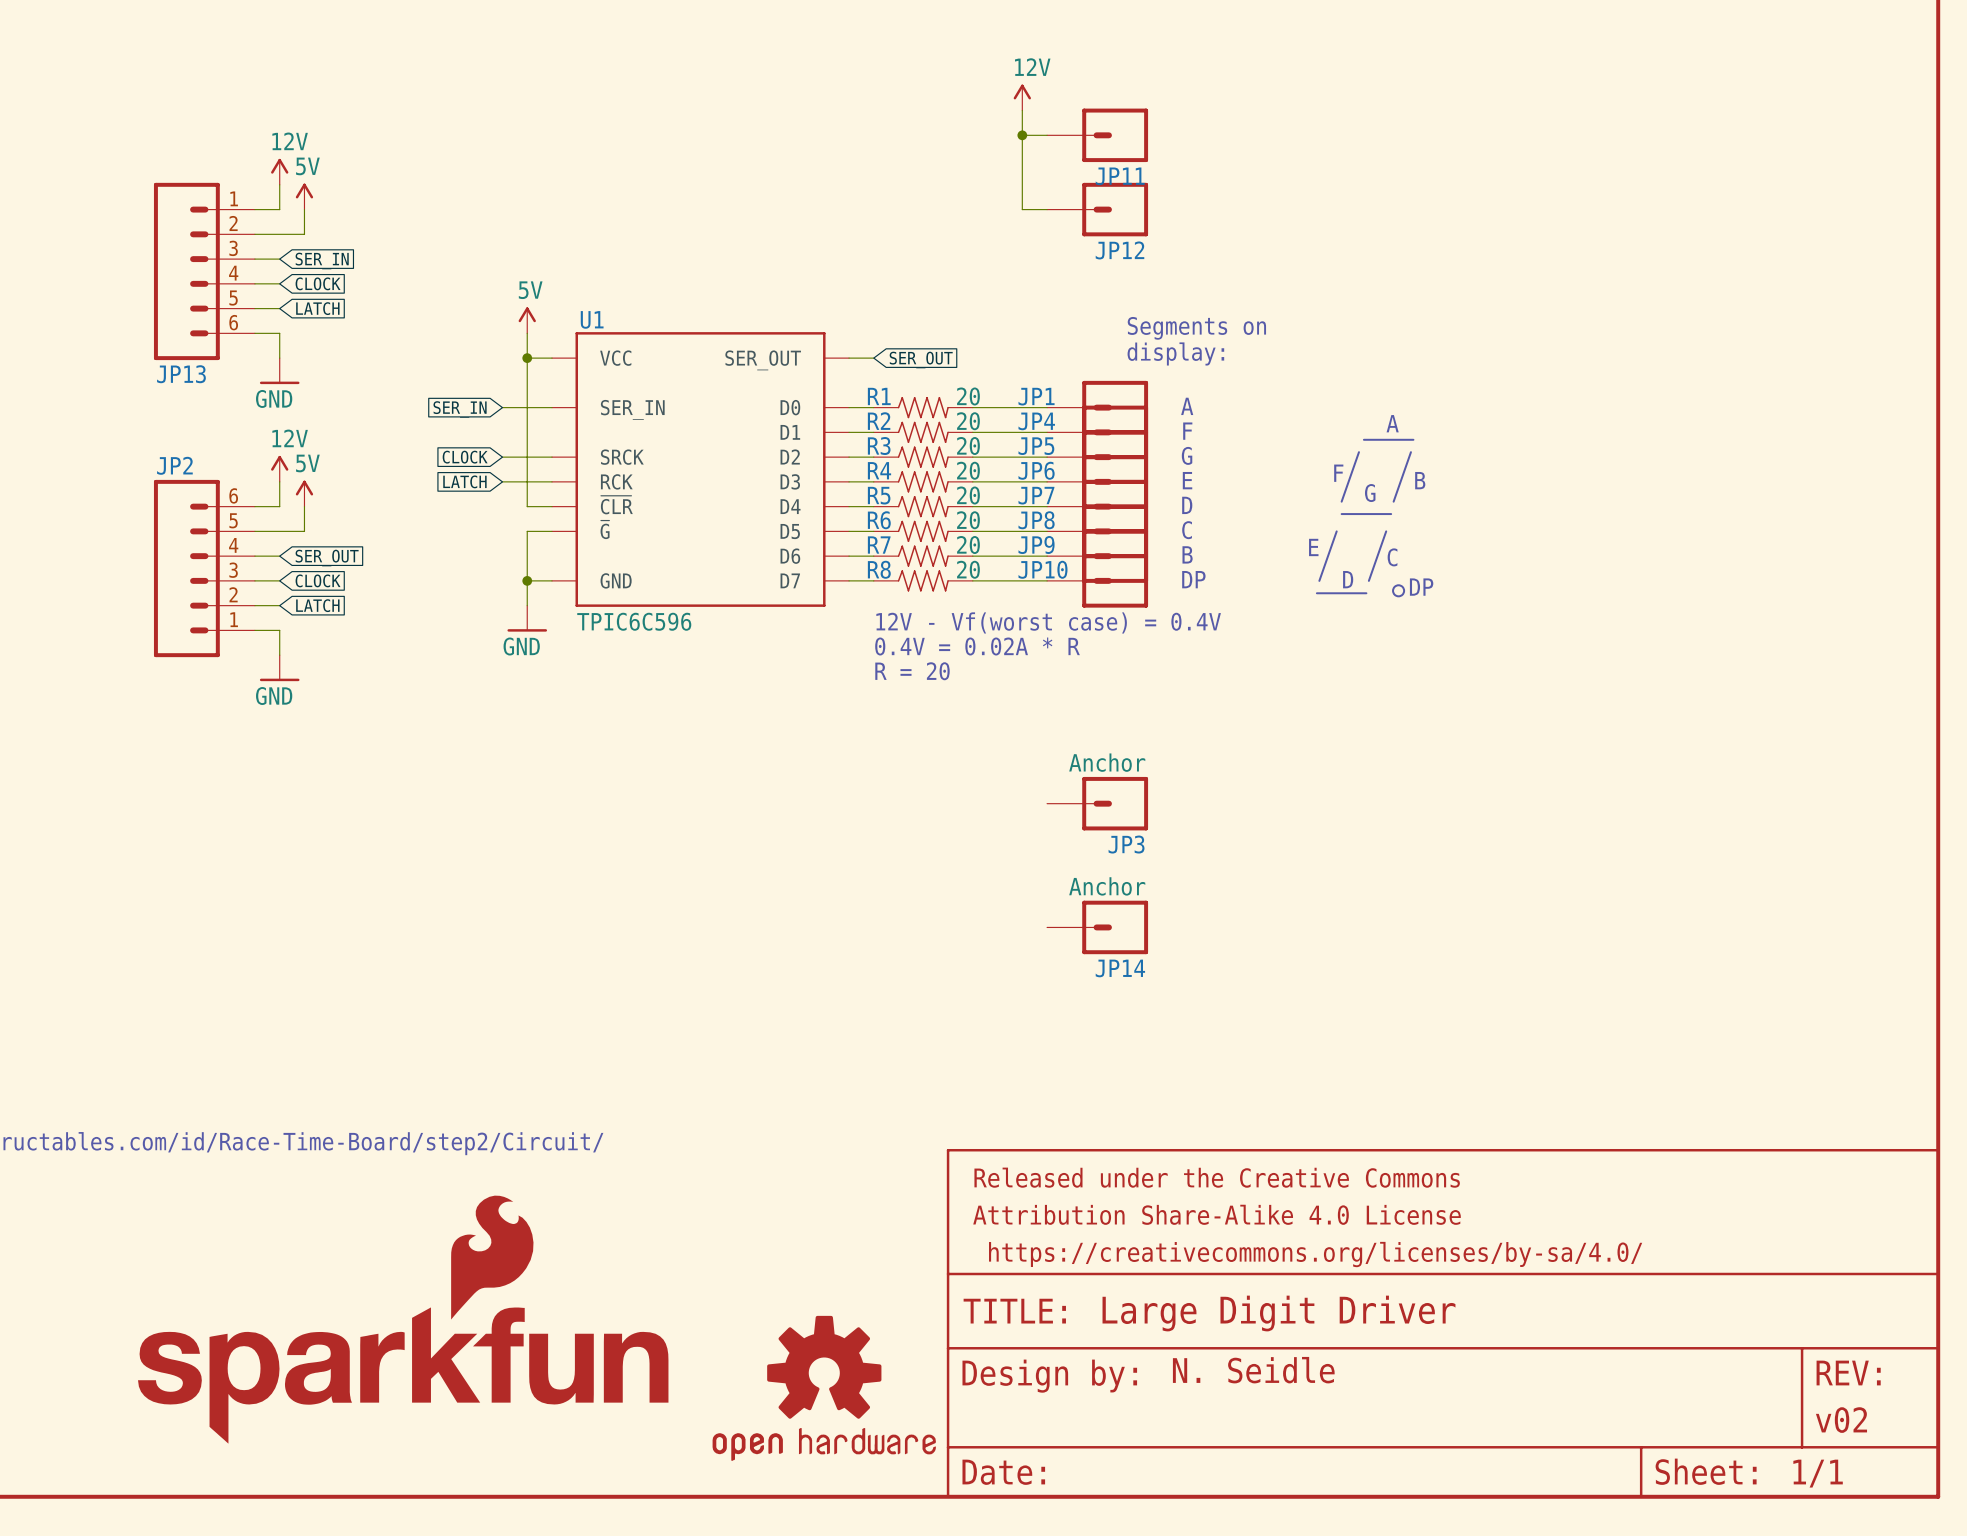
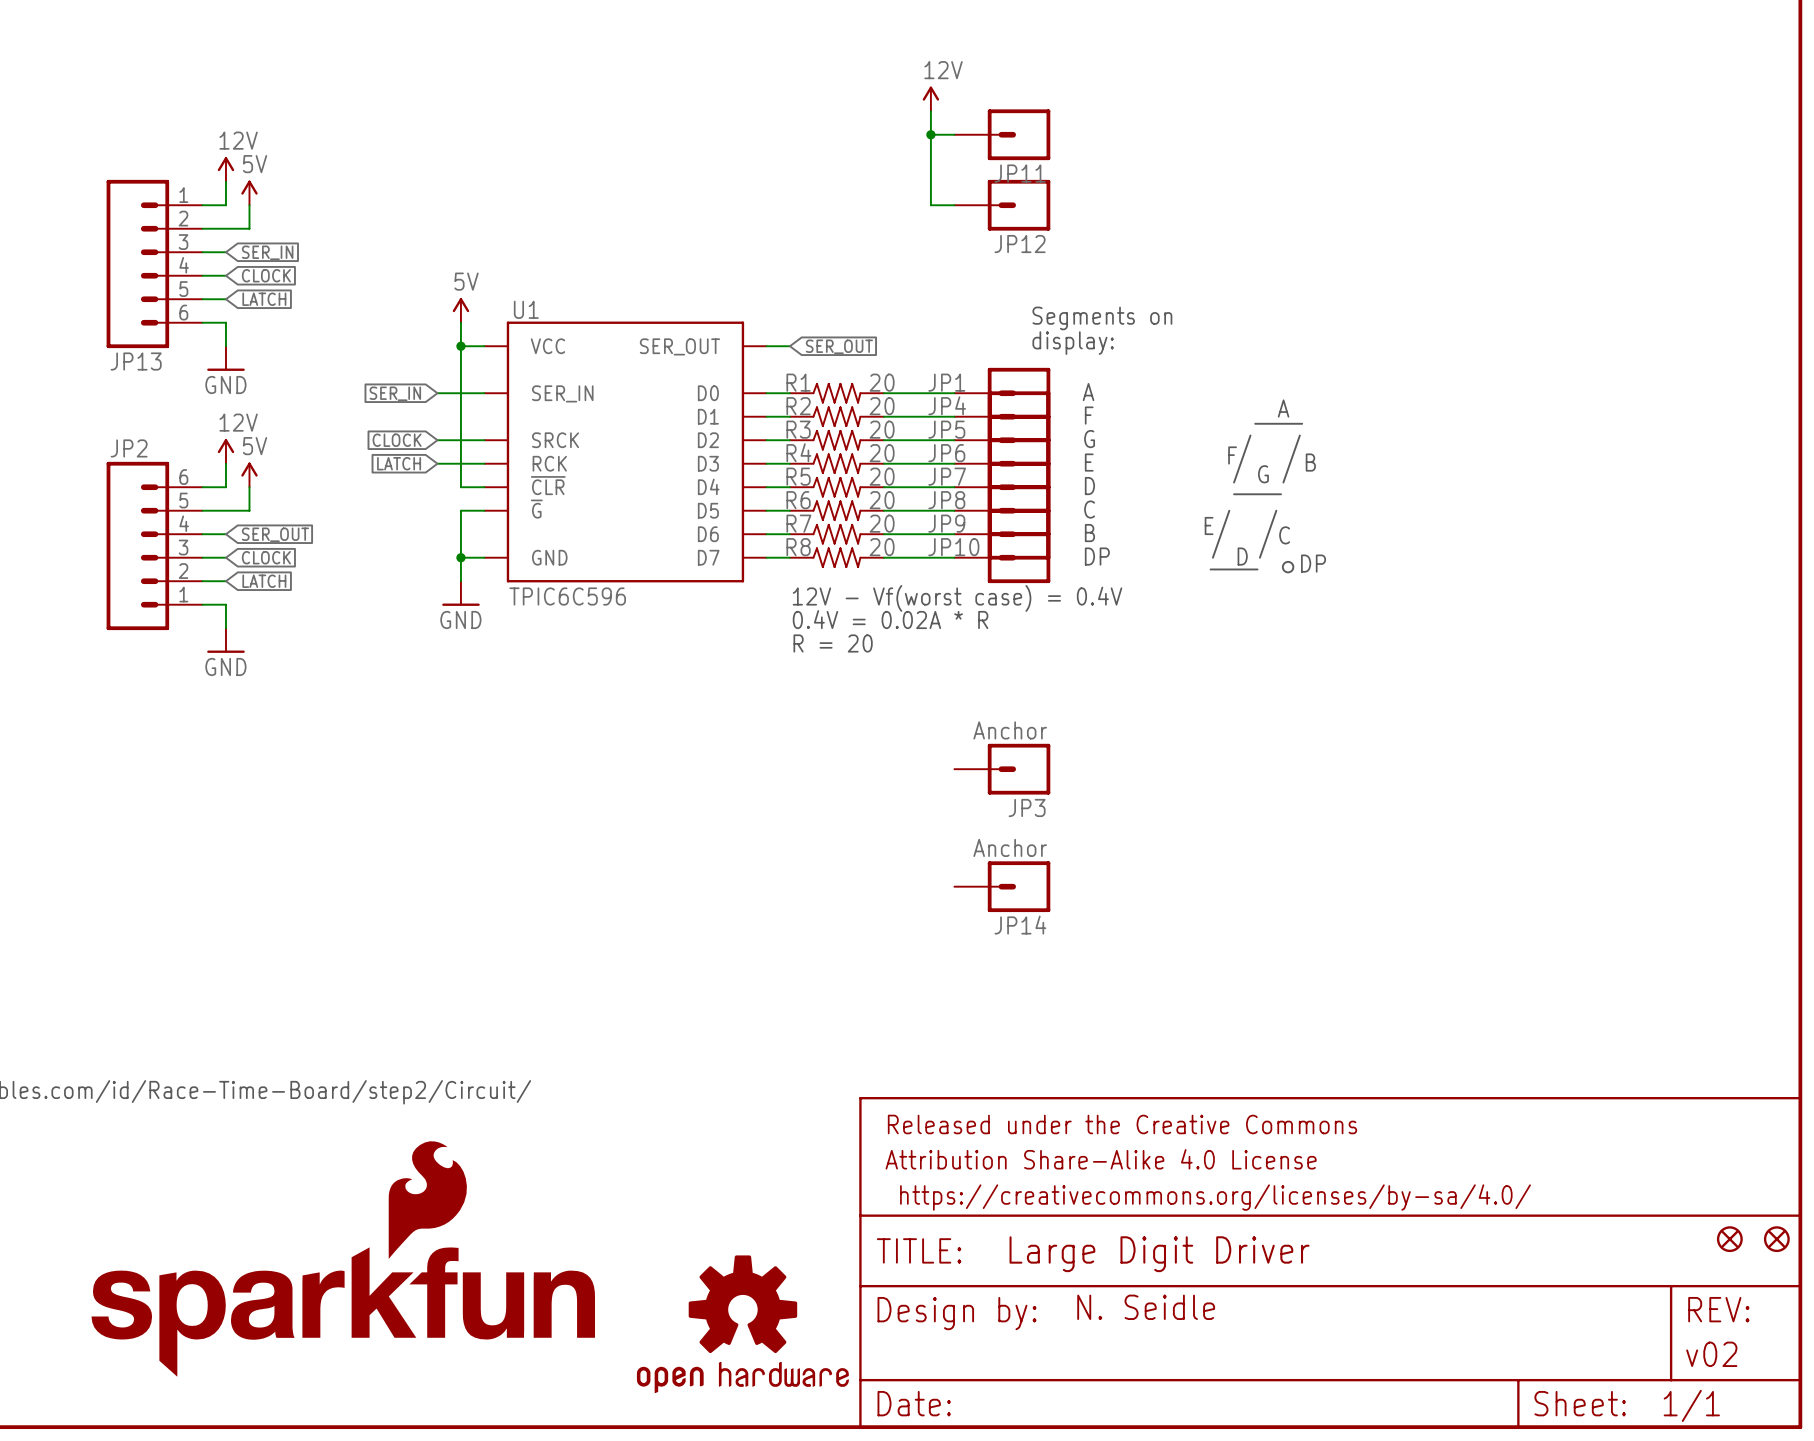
part: none -> (1729, 1239)
part: none -> (1776, 1239)

